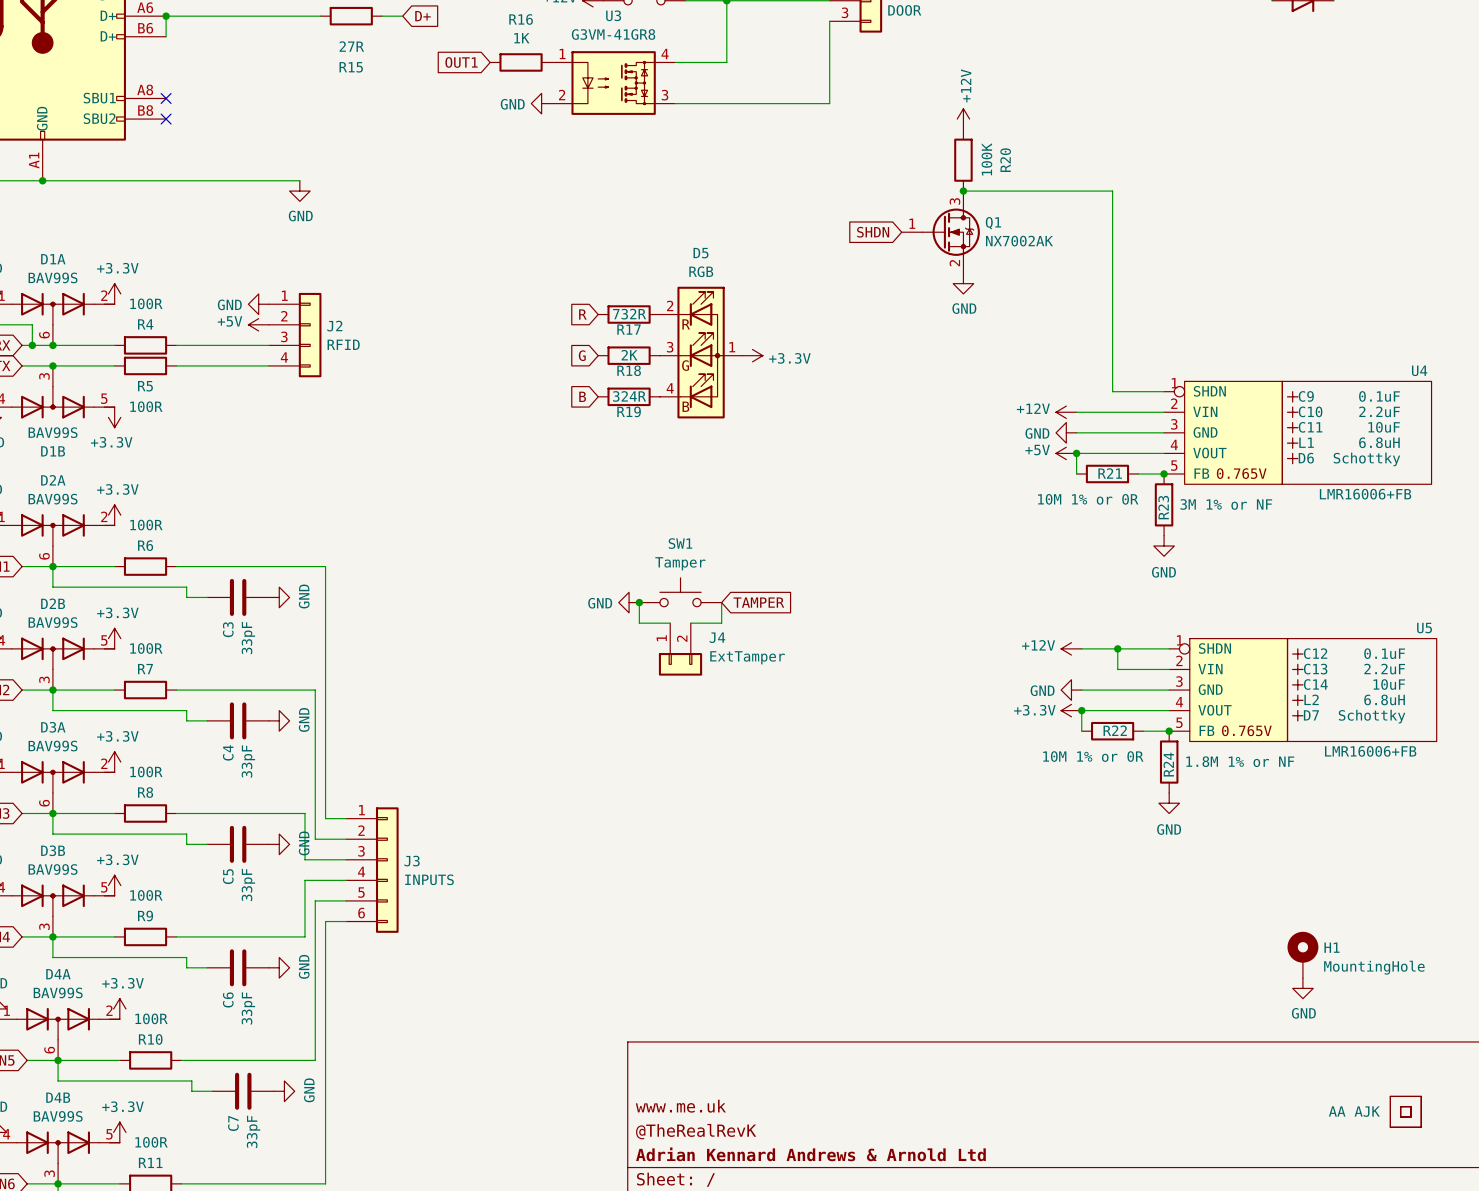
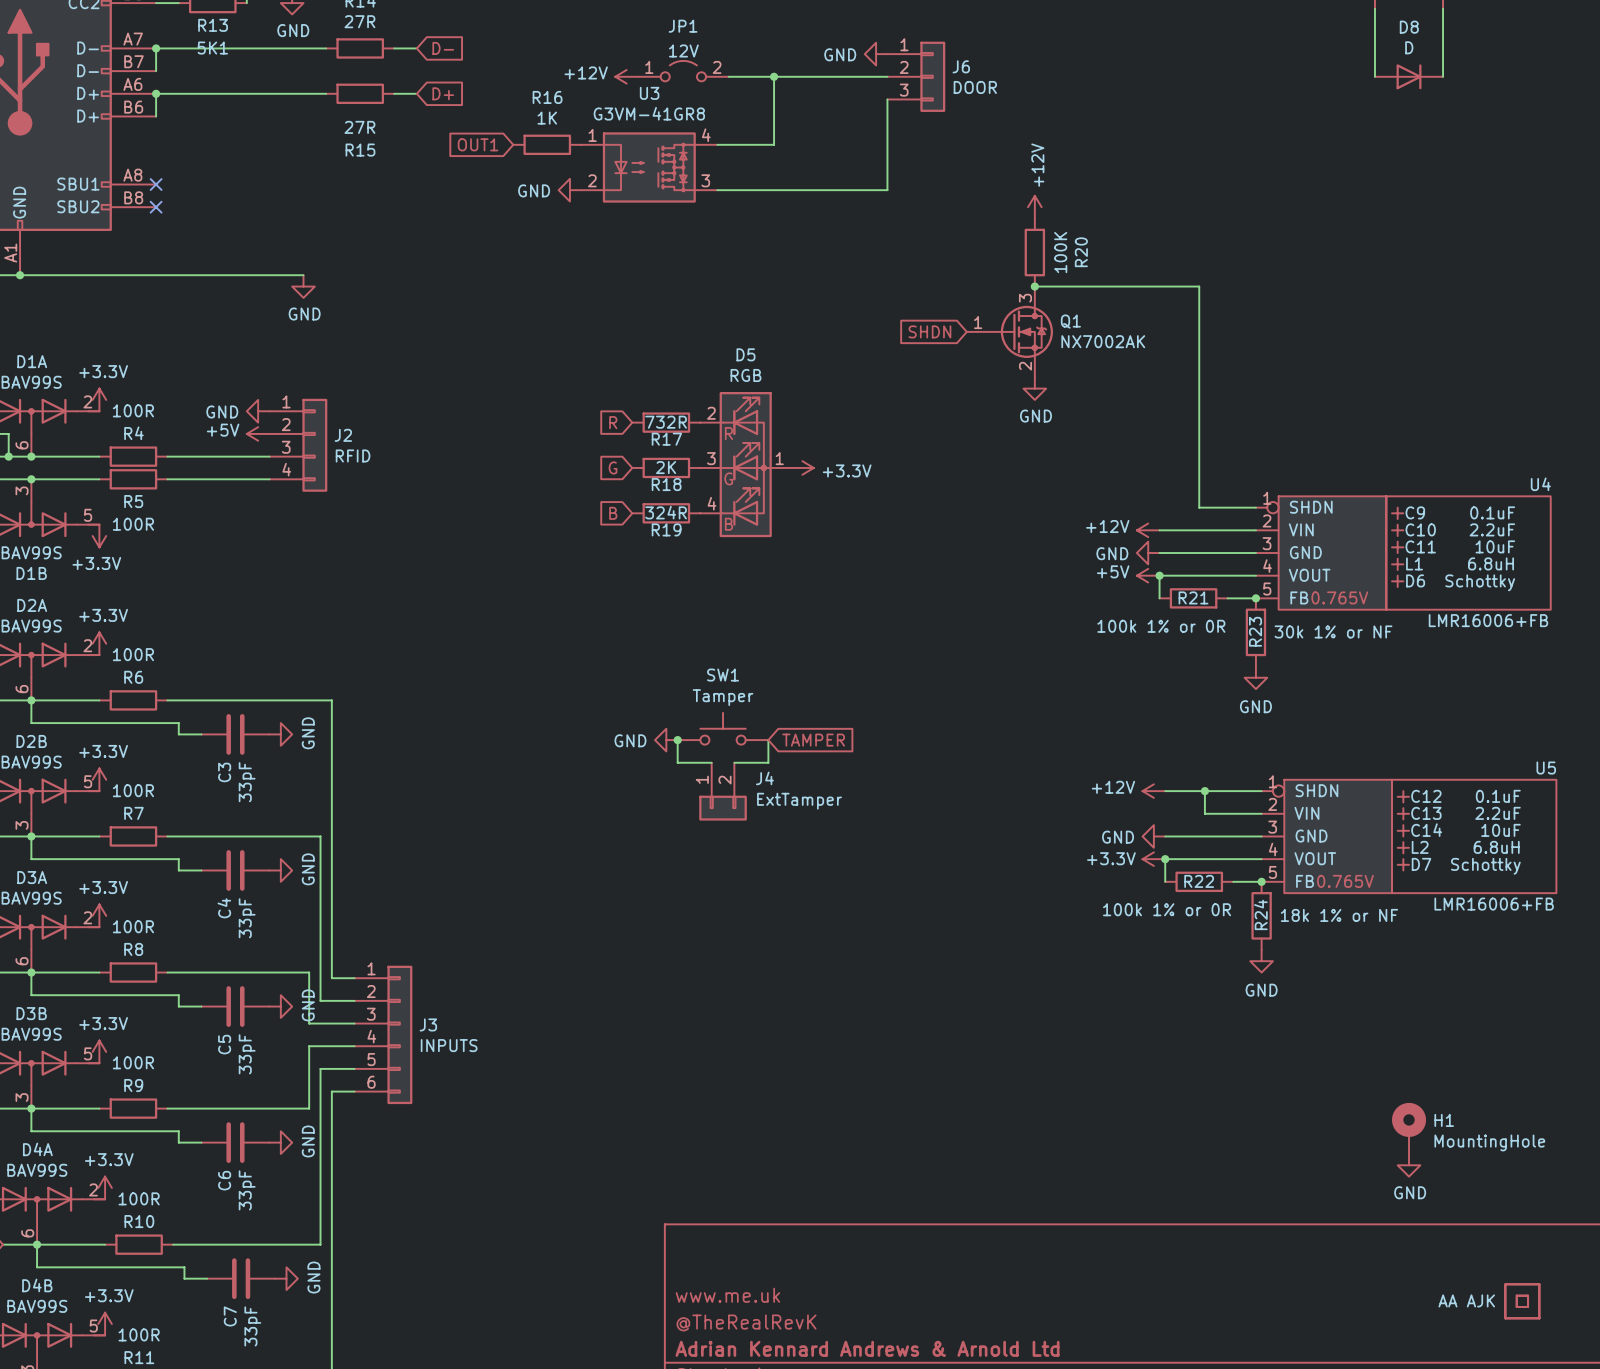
R21 value: 10M 1% or 0R (1088, 499) -> 100k 1% or 0R (1161, 626)
R23 value: 3M 1% or NF (1226, 504) -> 30k 1% or NF (1333, 631)
R22 value: 10M 1% or 0R (1093, 756) -> 100k 1% or 0R (1167, 909)
R24 value: 1.8M 1% or NF (1240, 761) -> 18k 1% or NF (1339, 915)

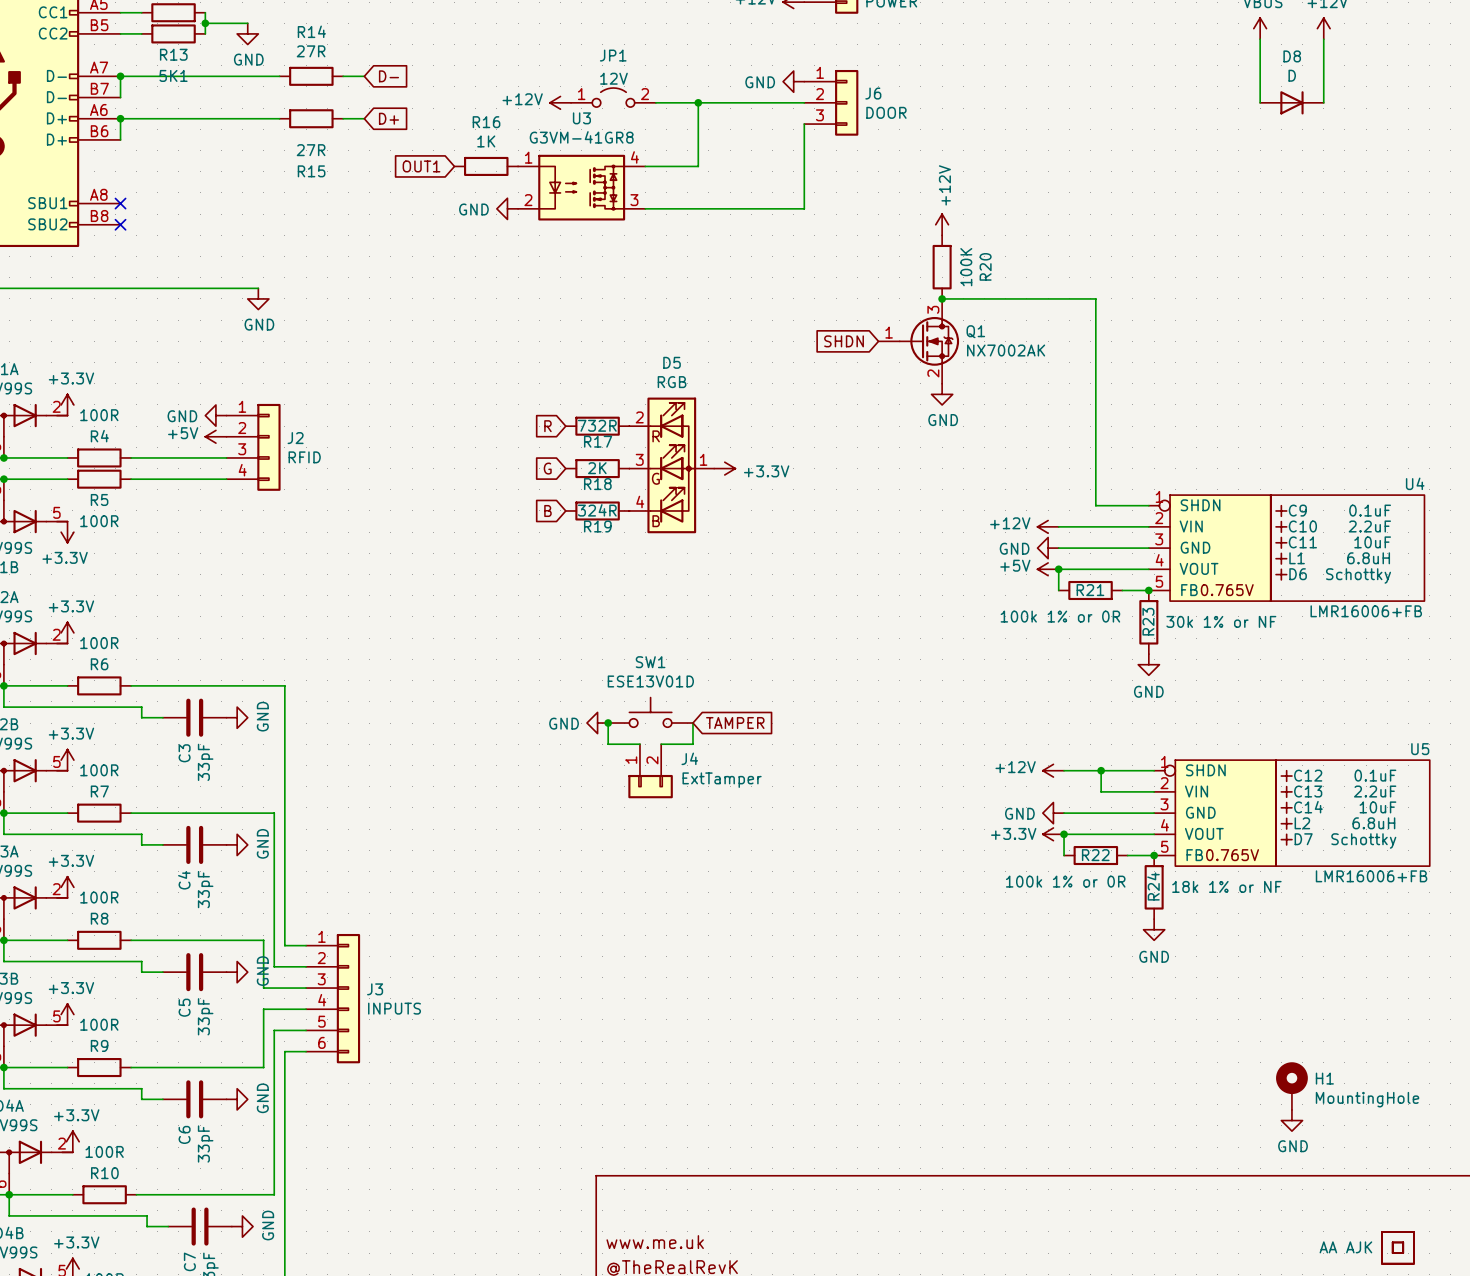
SW1 value: Tamper (723, 697) -> ESE13V01D (650, 681)

